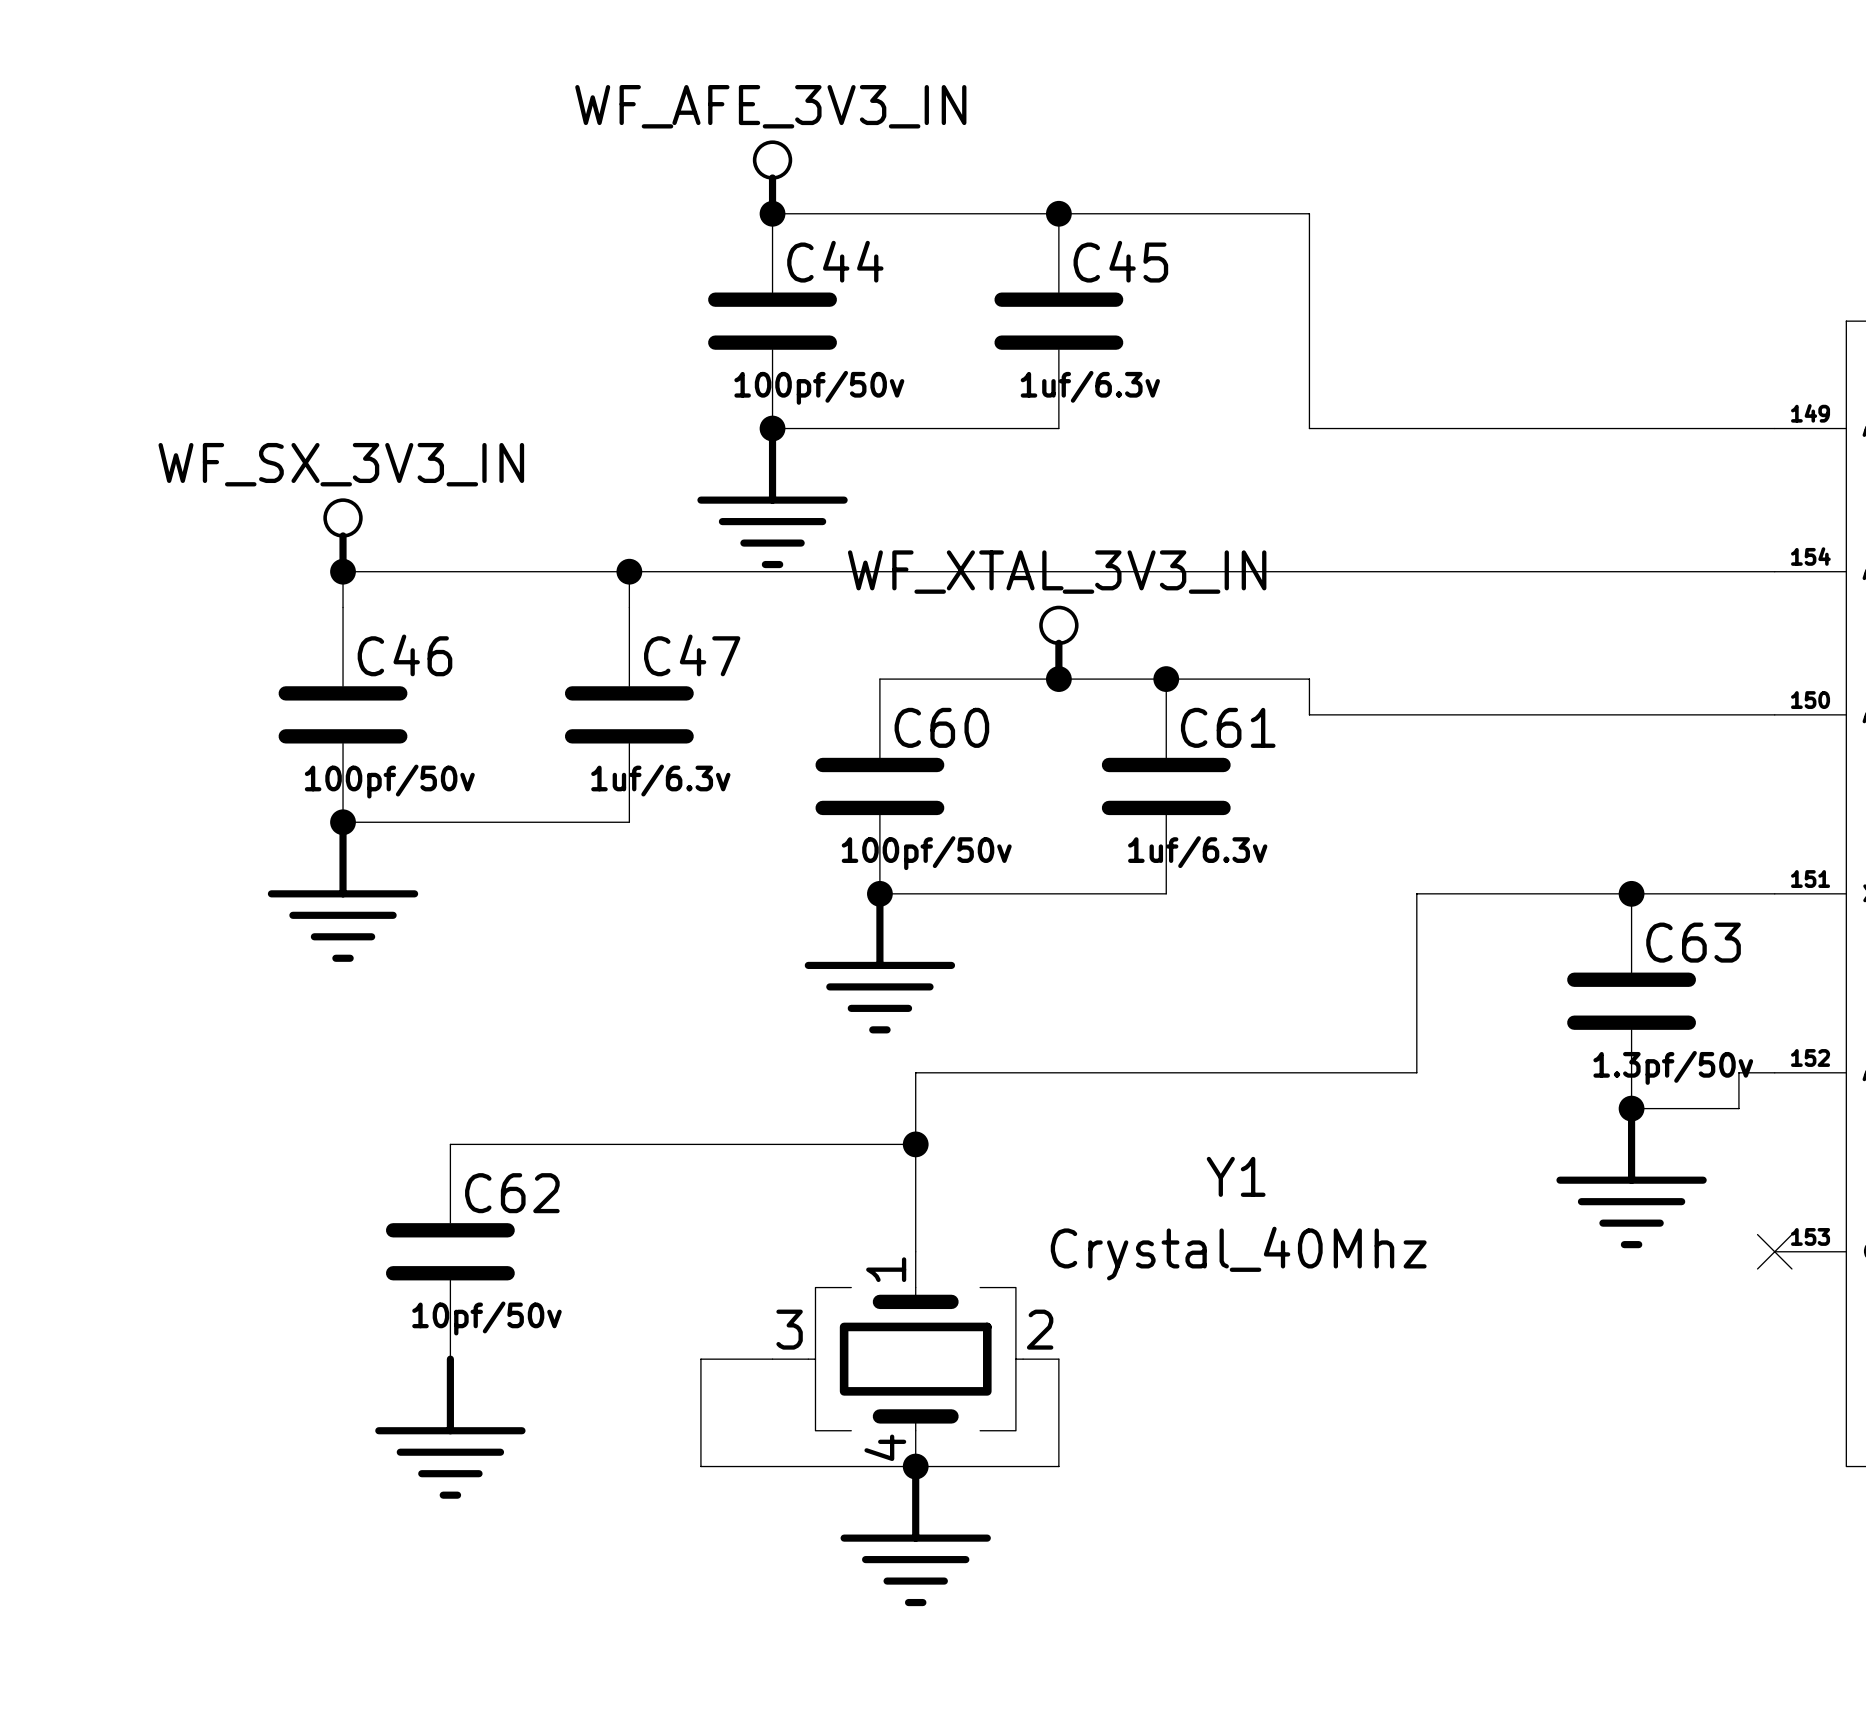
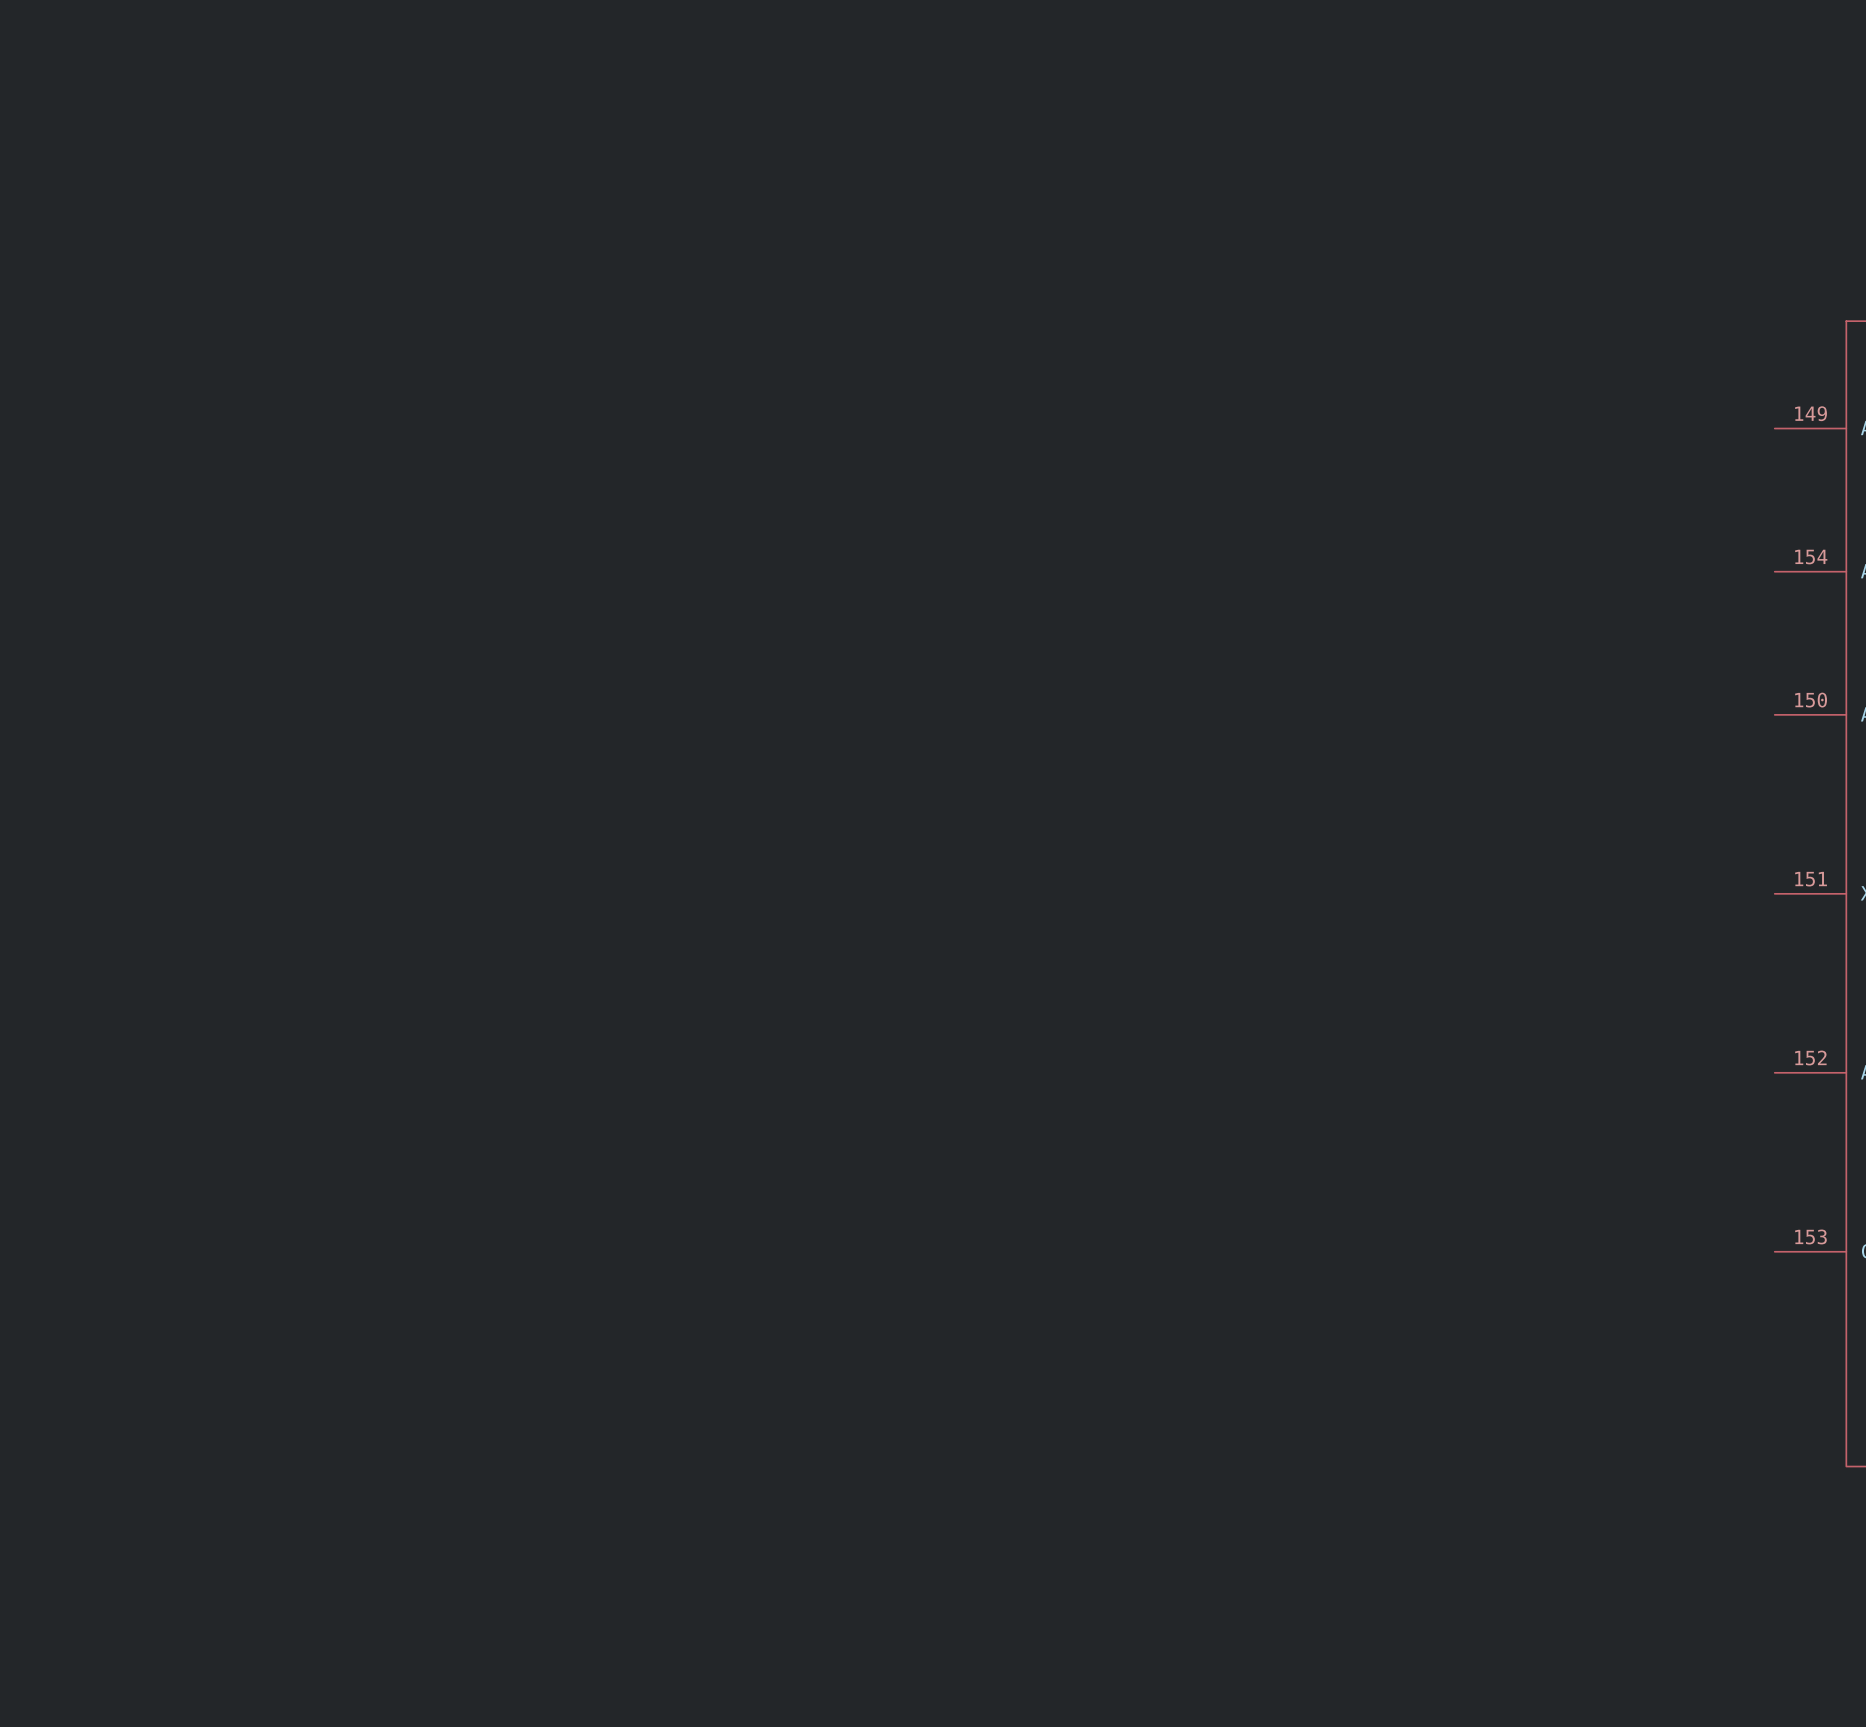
power symbol: WF_AFE_3V3_IN (772, 178) -> none
wire: (772, 213) (1309, 213) (1309, 428) (1774, 428) -> none
junction: (772, 213) -> none
junction: (1058, 213) -> none
C44: 100pf/50v (772, 321) -> none
C45: 1uf/6.3v (1058, 321) -> none
wire: (772, 428) (1058, 428) -> none
junction: (772, 428) -> none
power symbol: (772, 496) -> none
power symbol: WF_SX_3V3_IN (343, 536) -> none
junction: (343, 571) -> none
wire: (629, 571) (629, 607) -> none
junction: (629, 571) -> none
wire: (1774, 571) (343, 571) (343, 607) -> none
power symbol: WF_XTAL_3V3_IN (1058, 644) -> none
wire: (879, 679) (1309, 679) (1309, 714) (1774, 714) -> none
junction: (1058, 679) -> none
junction: (1166, 679) -> none
C46: 100pf/50v (343, 714) -> none
C47: 1uf/6.3v (629, 714) -> none
C60: 100pf/50v (879, 786) -> none
C61: 1uf/6.3v (1166, 786) -> none
wire: (343, 822) (629, 822) -> none
junction: (343, 822) -> none
power symbol: (343, 890) -> none
wire: (879, 893) (1166, 893) -> none
junction: (879, 893) -> none
junction: (1631, 893) -> none
wire: (1774, 893) (1416, 893) (1416, 1072) (915, 1072) (915, 1251) -> none
power symbol: (879, 961) -> none
C63: 1.3pf/50v (1631, 1001) -> none
wire: (1774, 1072) (1738, 1072) (1738, 1108) (1631, 1108) -> none
junction: (1631, 1108) -> none
wire: (450, 1144) (915, 1144) -> none
junction: (915, 1144) -> none
power symbol: (1631, 1176) -> none
C62: 10pf/50v (450, 1251) -> none
no-connect mark: (1774, 1251) -> none
wire: (772, 1359) (700, 1359) (700, 1466) (1058, 1466) (1058, 1359) -> none
Y1: Crystal_40Mhz (915, 1359) -> none
power symbol: (450, 1427) -> none
junction: (915, 1466) -> none
power symbol: (915, 1534) -> none

